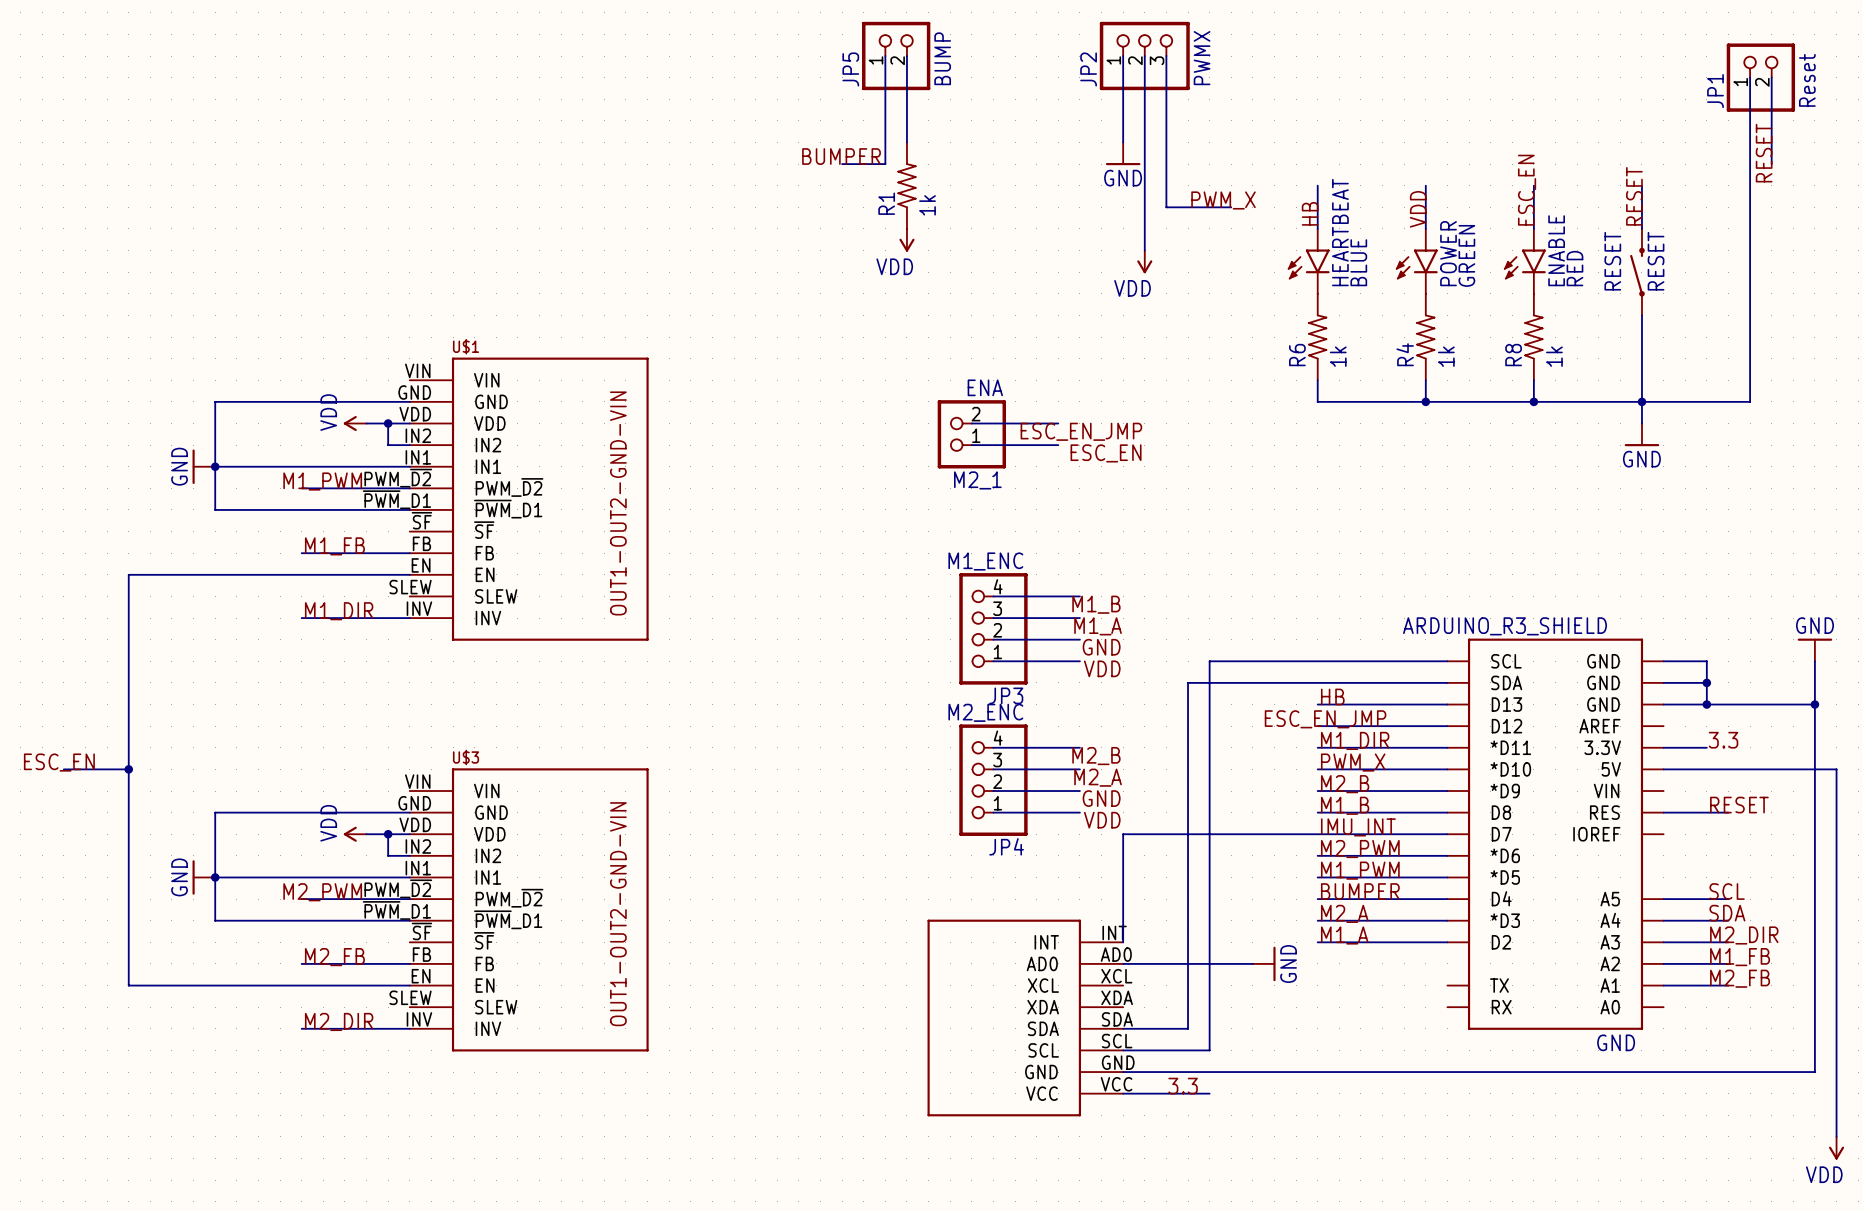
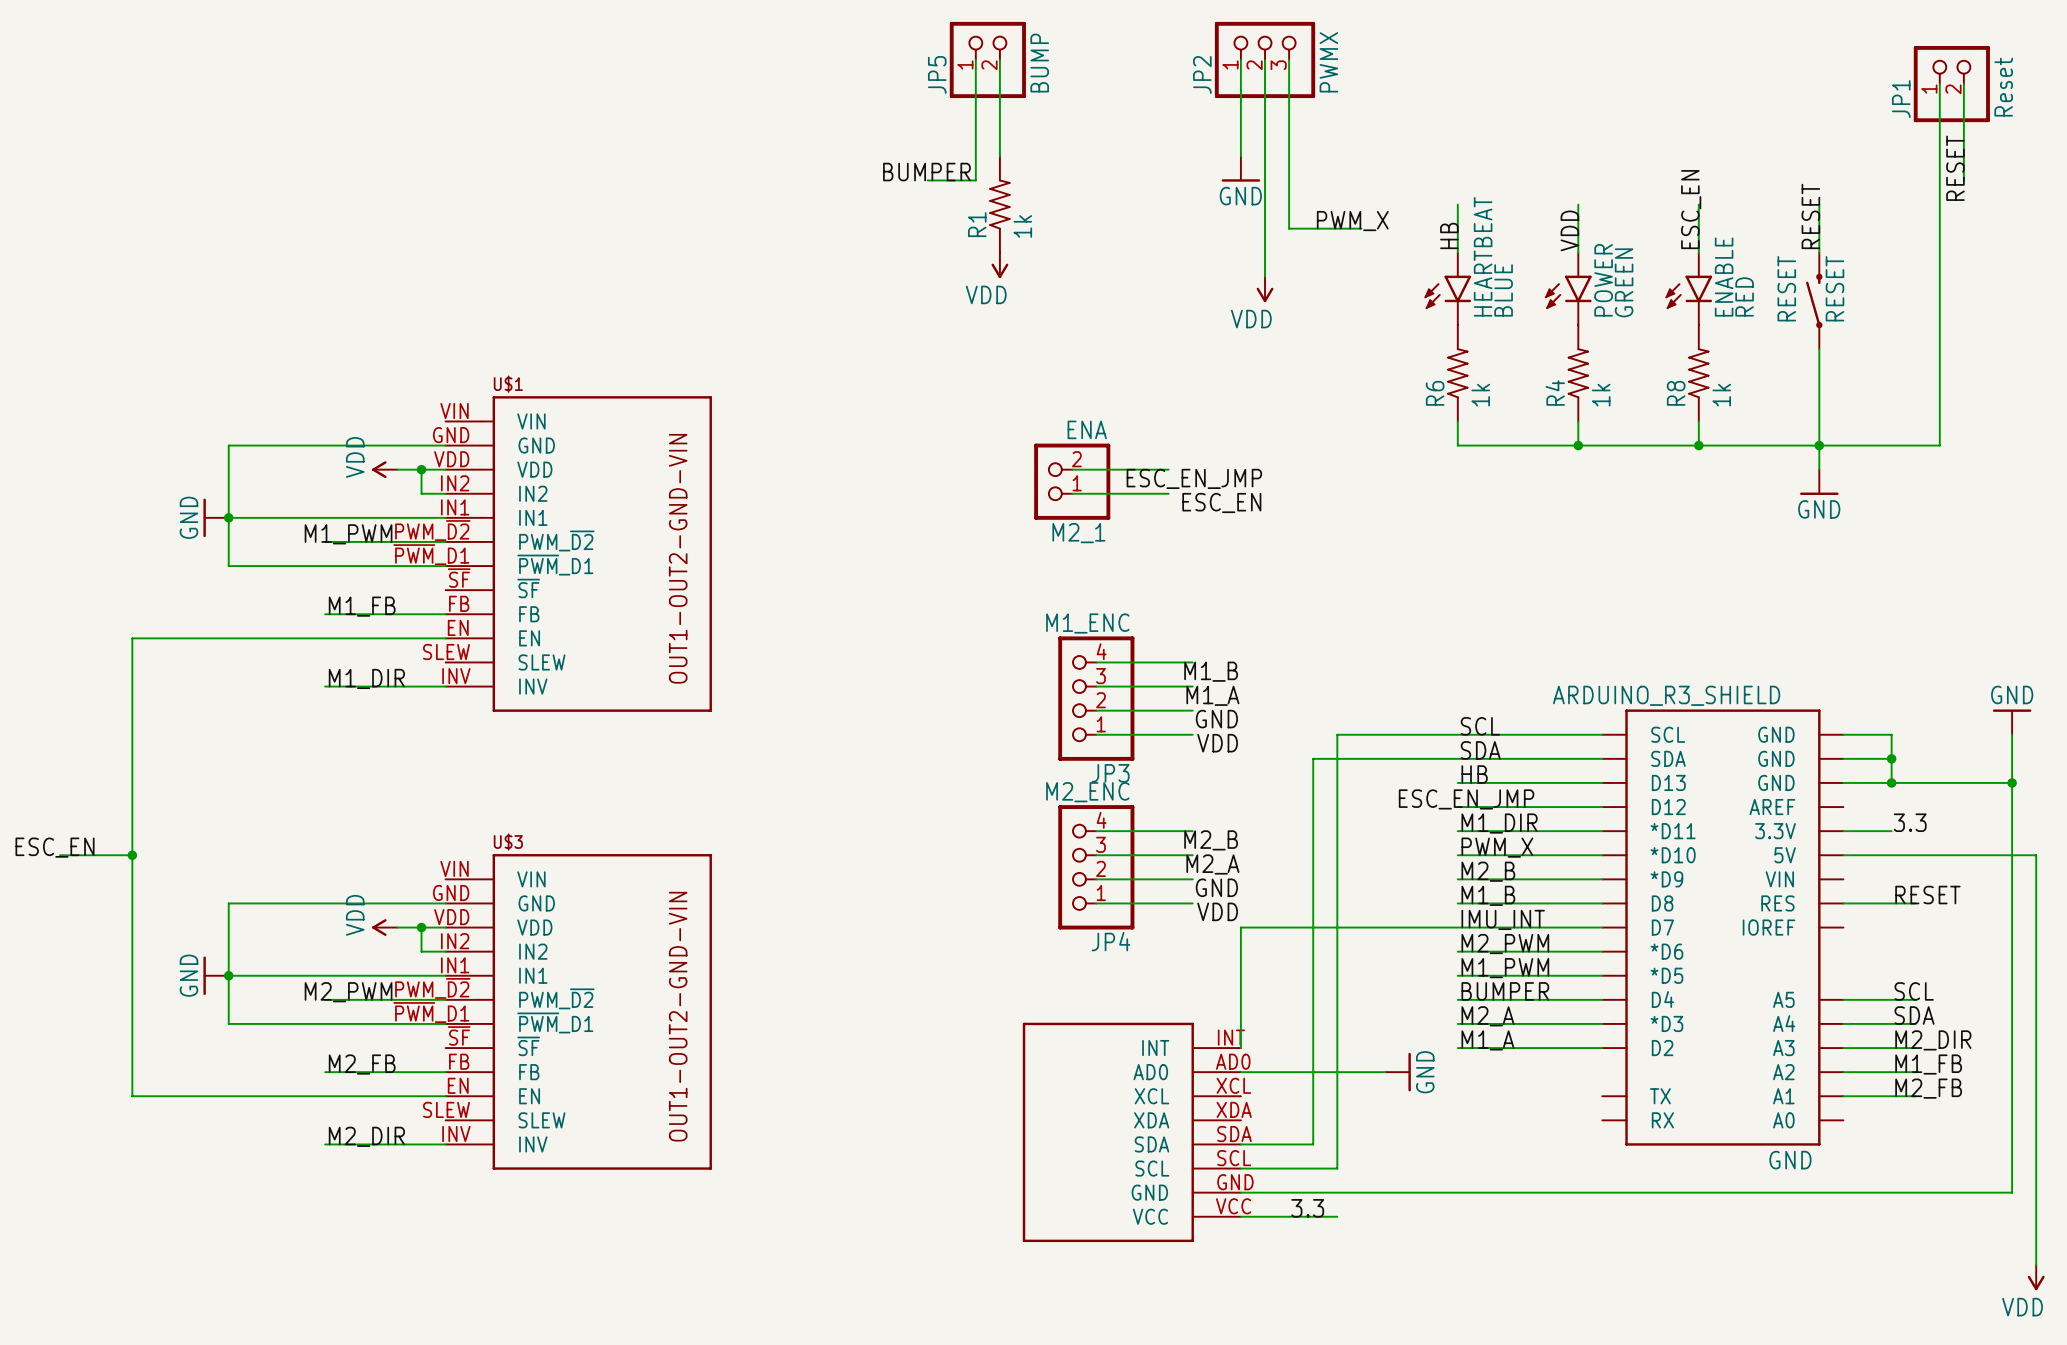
label: none -> SCL (1480, 726)
label: none -> SDA (1480, 750)

